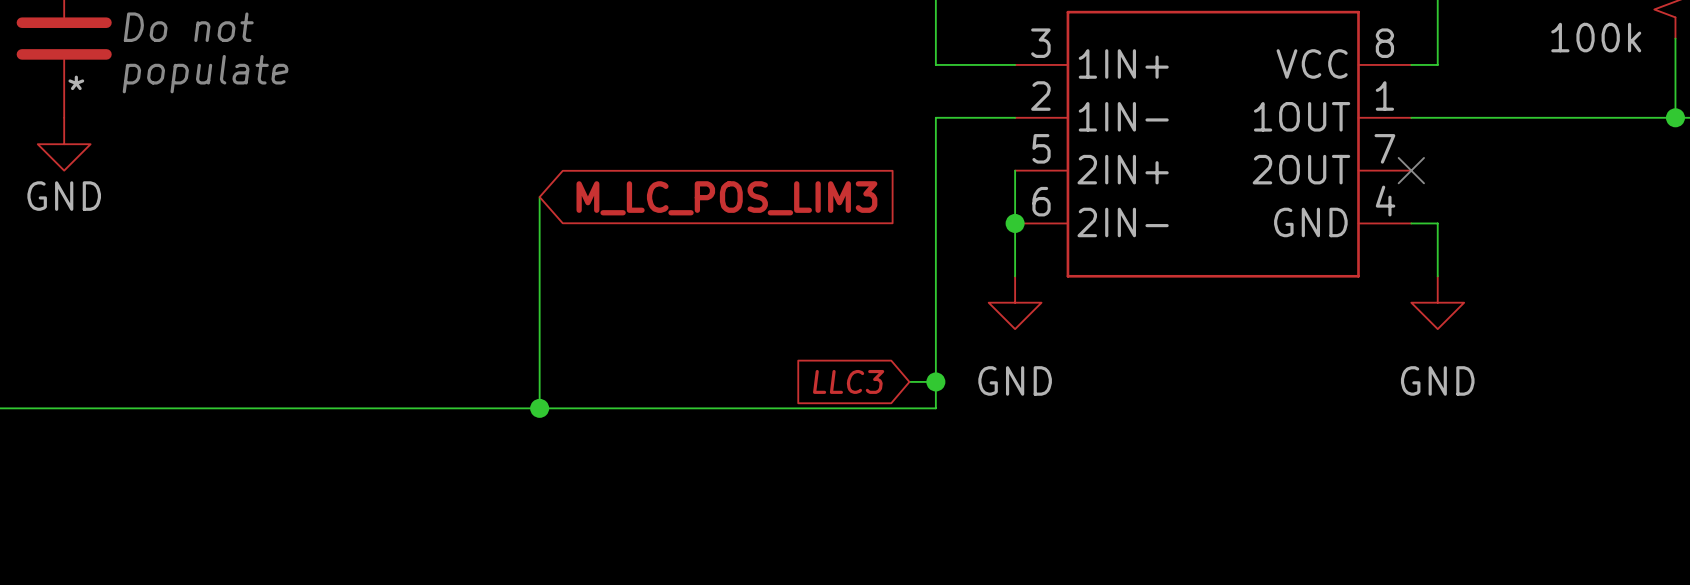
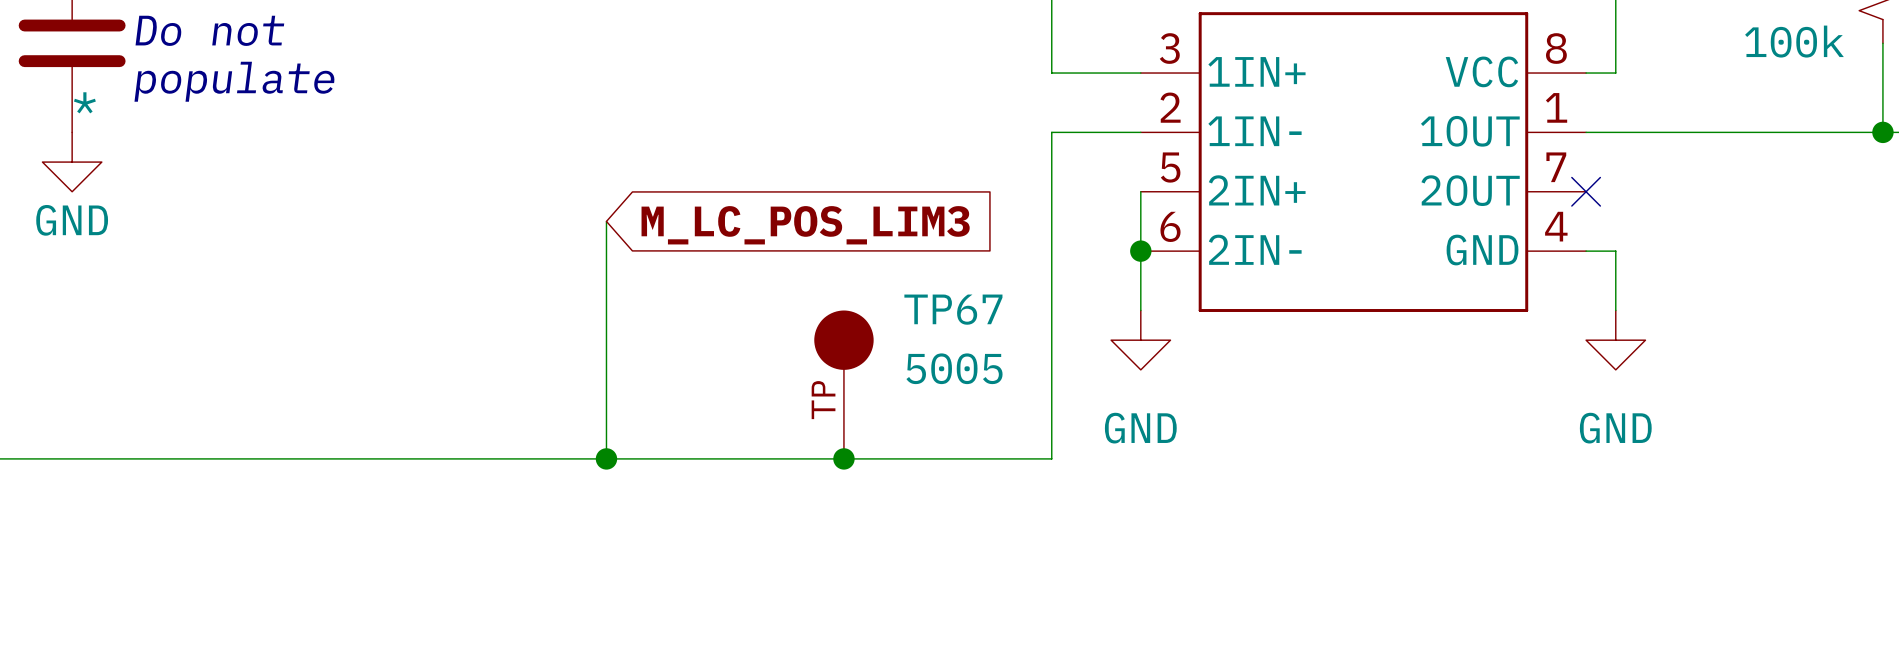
TP67: none -> 5005 (843, 384)
global label: LLC3 (848, 381) -> none
wire: (909, 381) (935, 381) -> none
junction: (935, 381) -> none
junction: none -> (843, 458)

